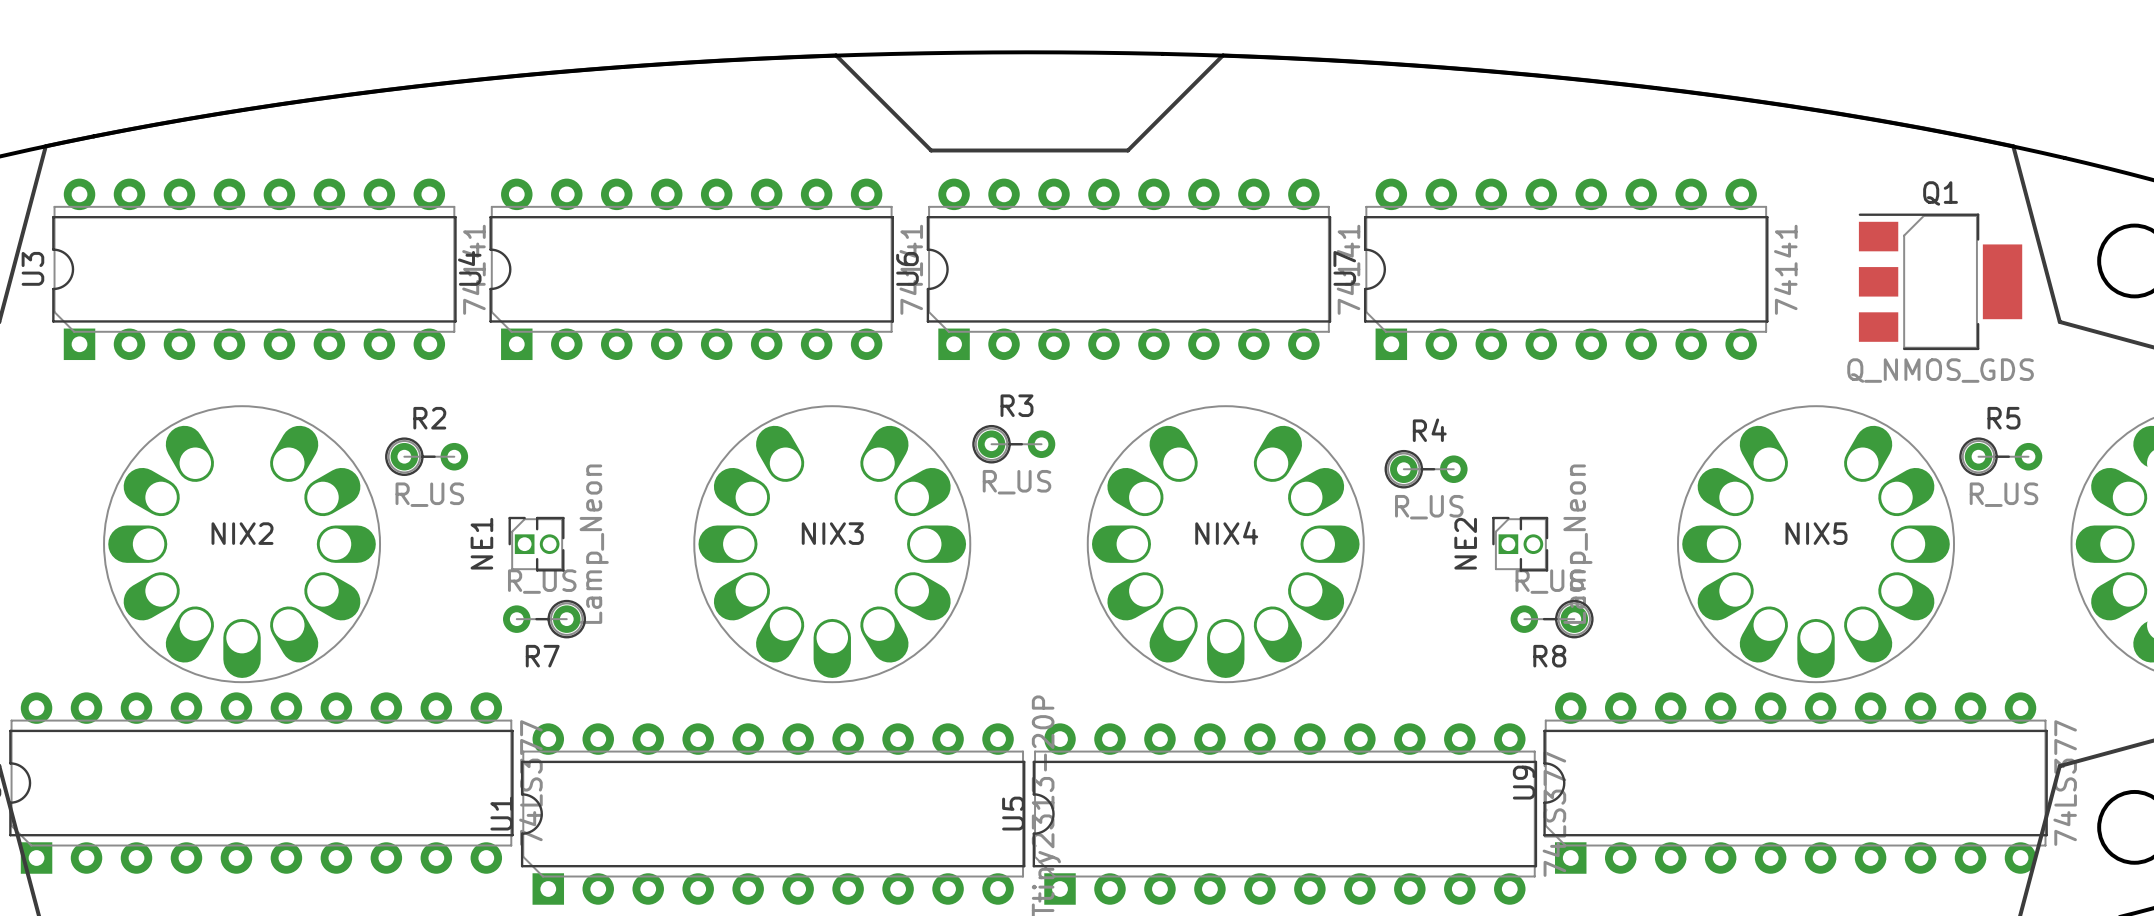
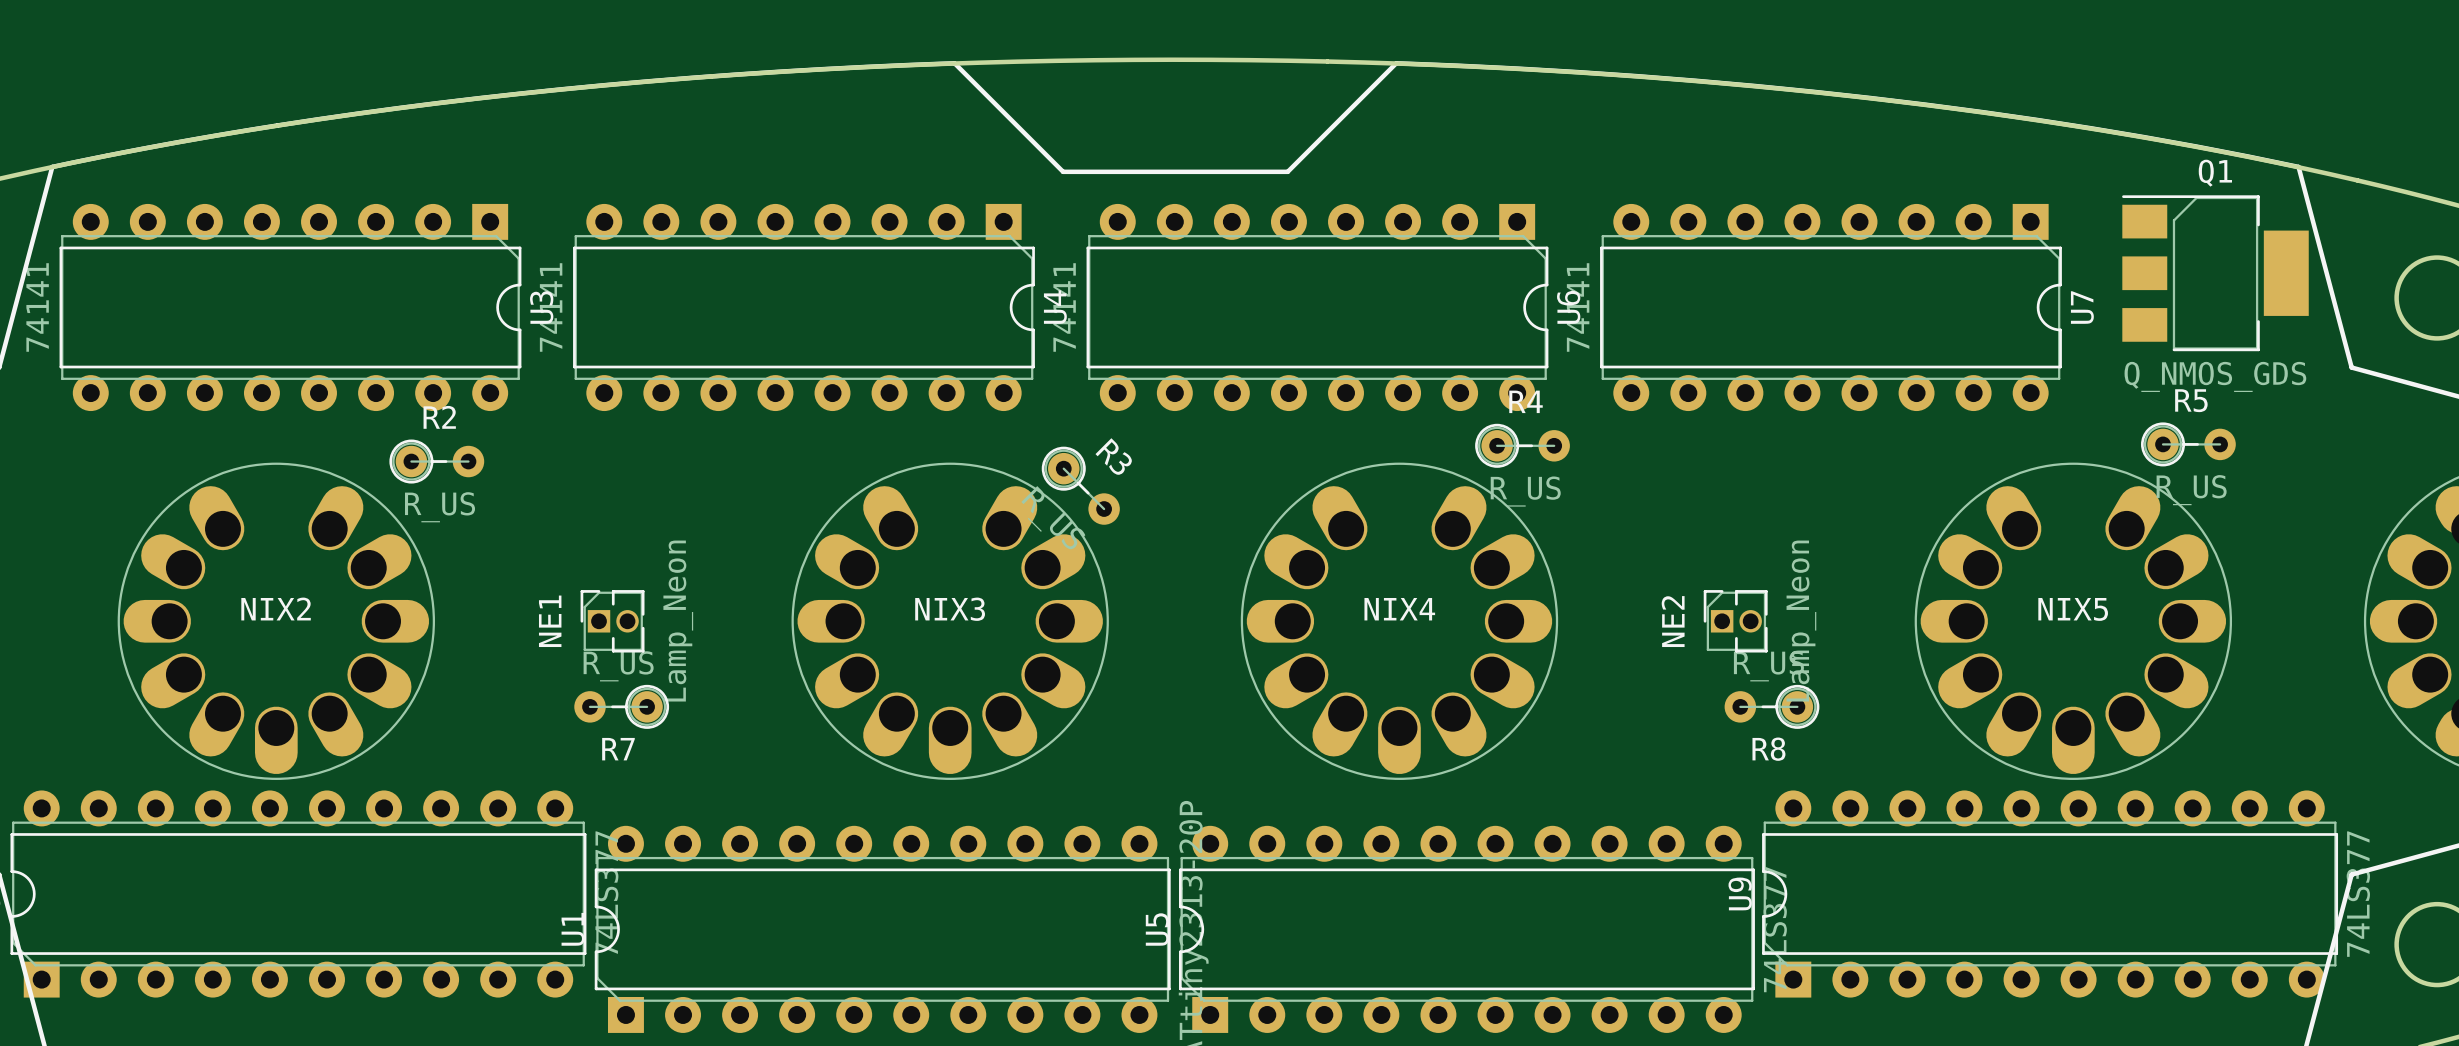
U3 rotation: 0° (254, 269) -> 180° (290, 307)
U4 rotation: 0° (691, 269) -> 180° (803, 307)
U6 rotation: 0° (1128, 269) -> 180° (1317, 307)
U7 rotation: 0° (1566, 269) -> 180° (1830, 307)
Q1 position: (1940, 281) -> (2215, 273)
R3 rotation: 0° (1013, 444) -> 45° clockwise (1080, 485)
R3 position: (1013, 444) -> (1080, 485)
R2 position: (426, 456) -> (436, 461)
R5 position: (2000, 456) -> (2188, 444)
R4 position: (1426, 469) -> (1522, 445)

